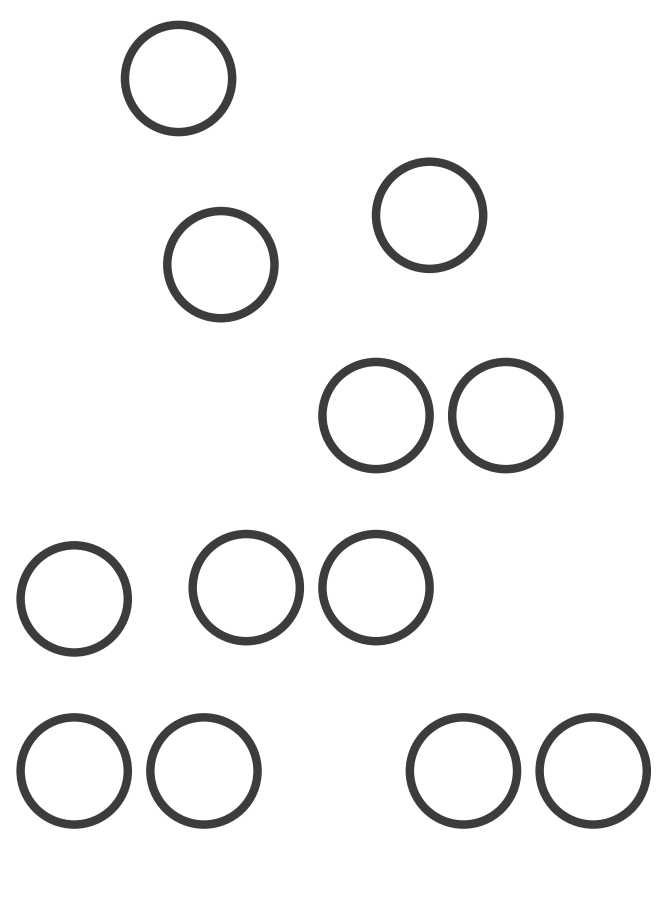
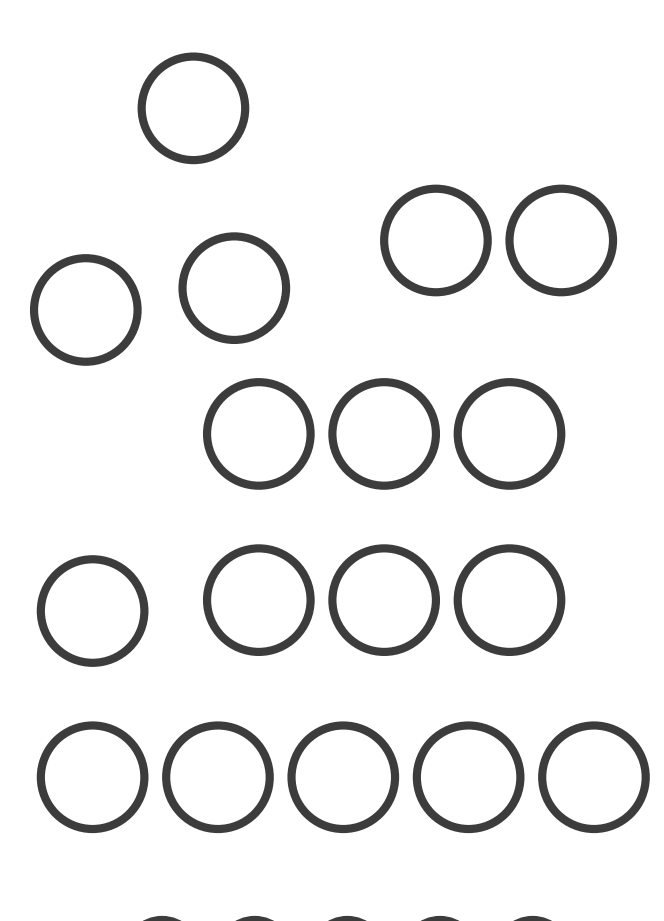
part: none -> (561, 240)
part: none -> (85, 309)
part: none -> (258, 433)
part: none -> (509, 600)
part: none -> (343, 777)

